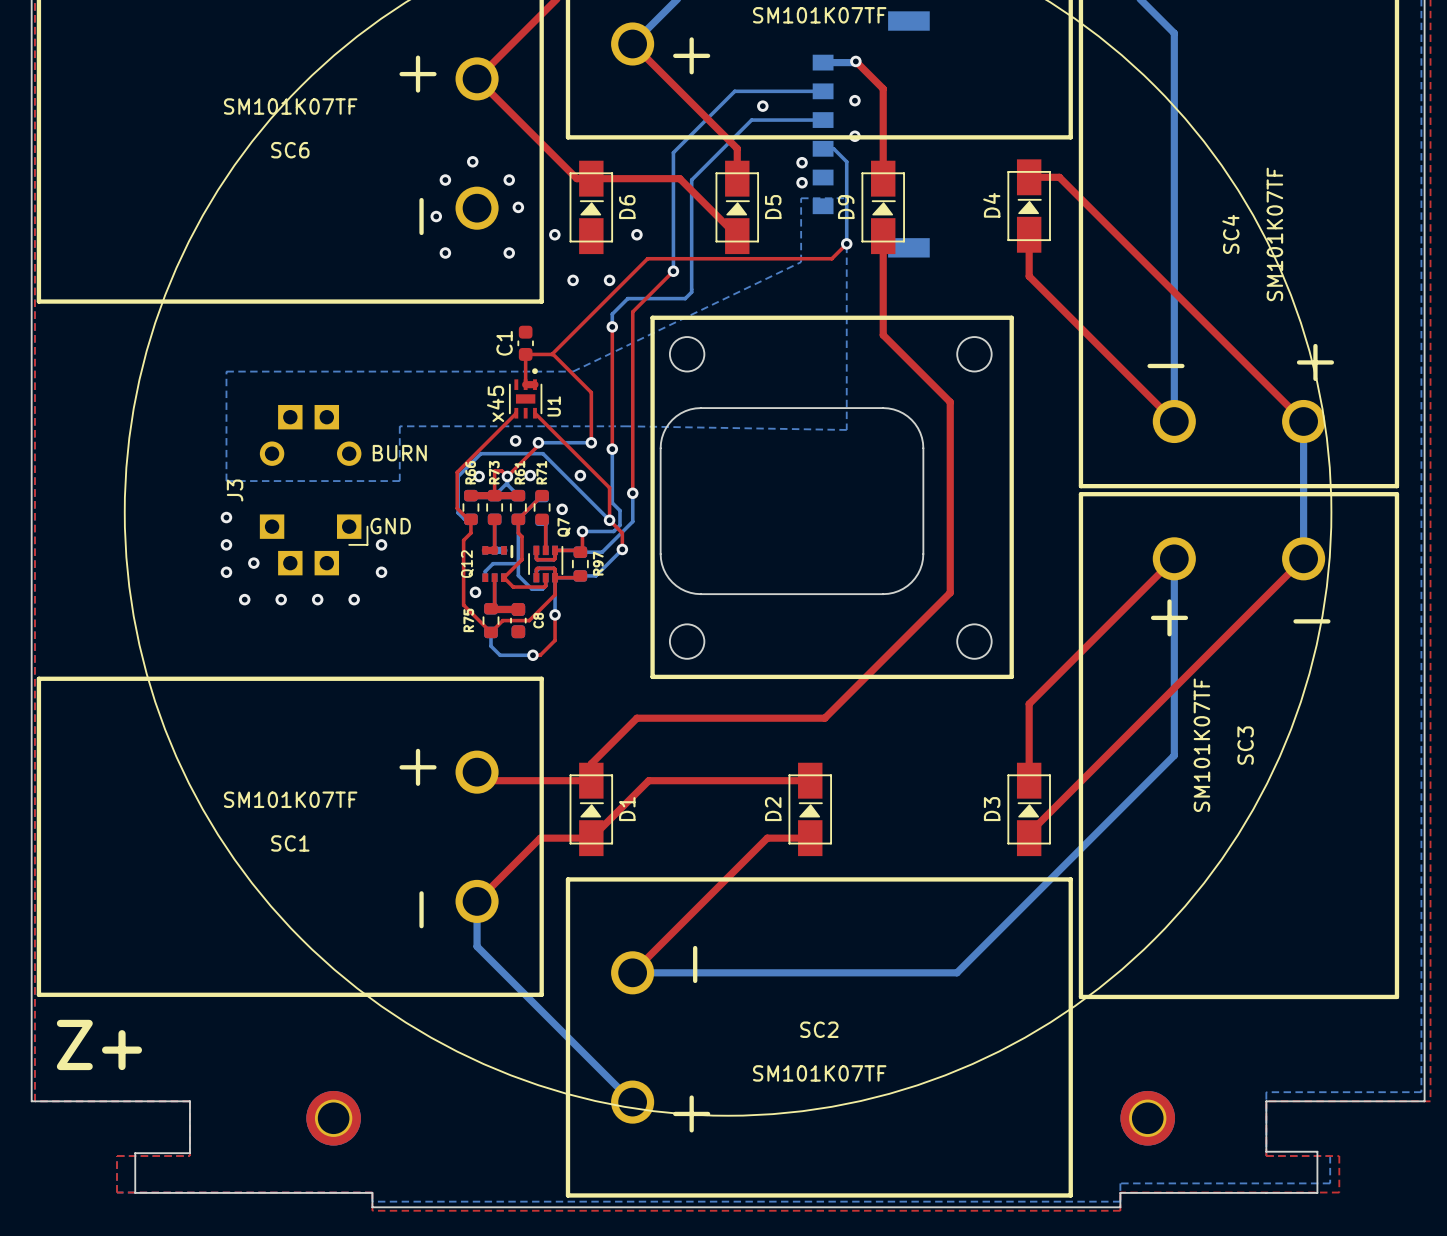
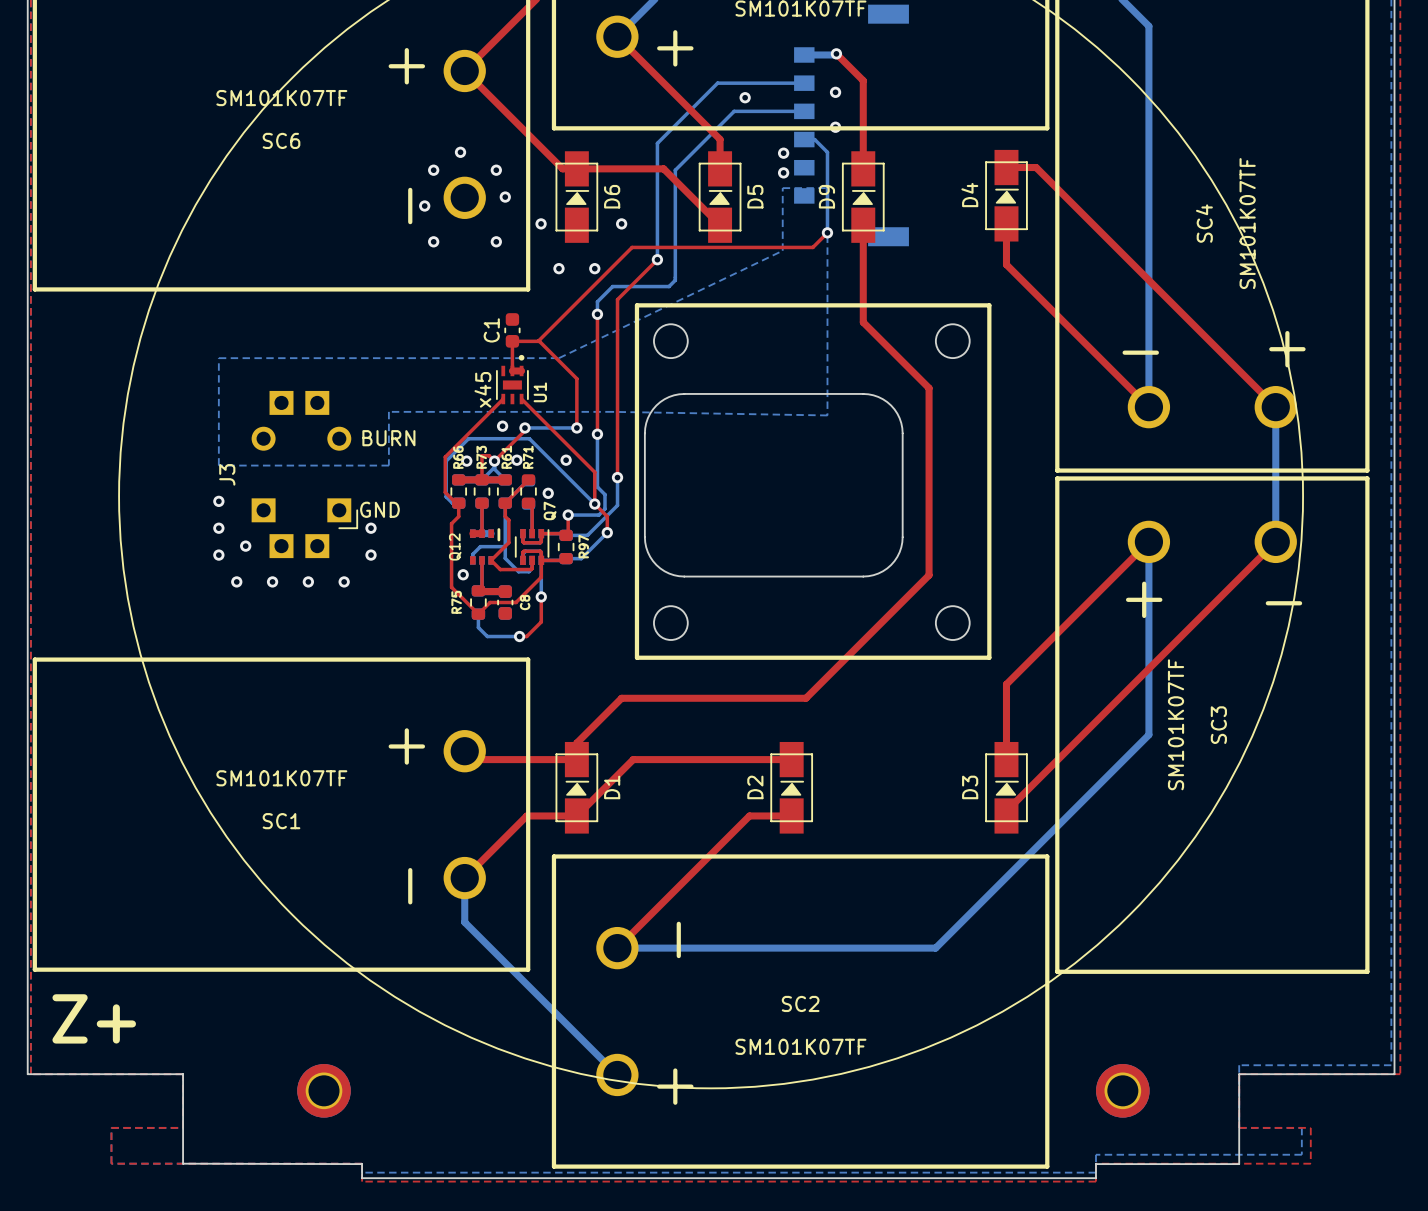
board edge: (1266, 1151) (1317, 1151) (1317, 1192) (1266, 1192) -> (1239, 1123) (1239, 1164)
board edge: (189, 1153) (135, 1153) (135, 1192) (372, 1192) -> (183, 1125) (183, 1163) (362, 1164)

